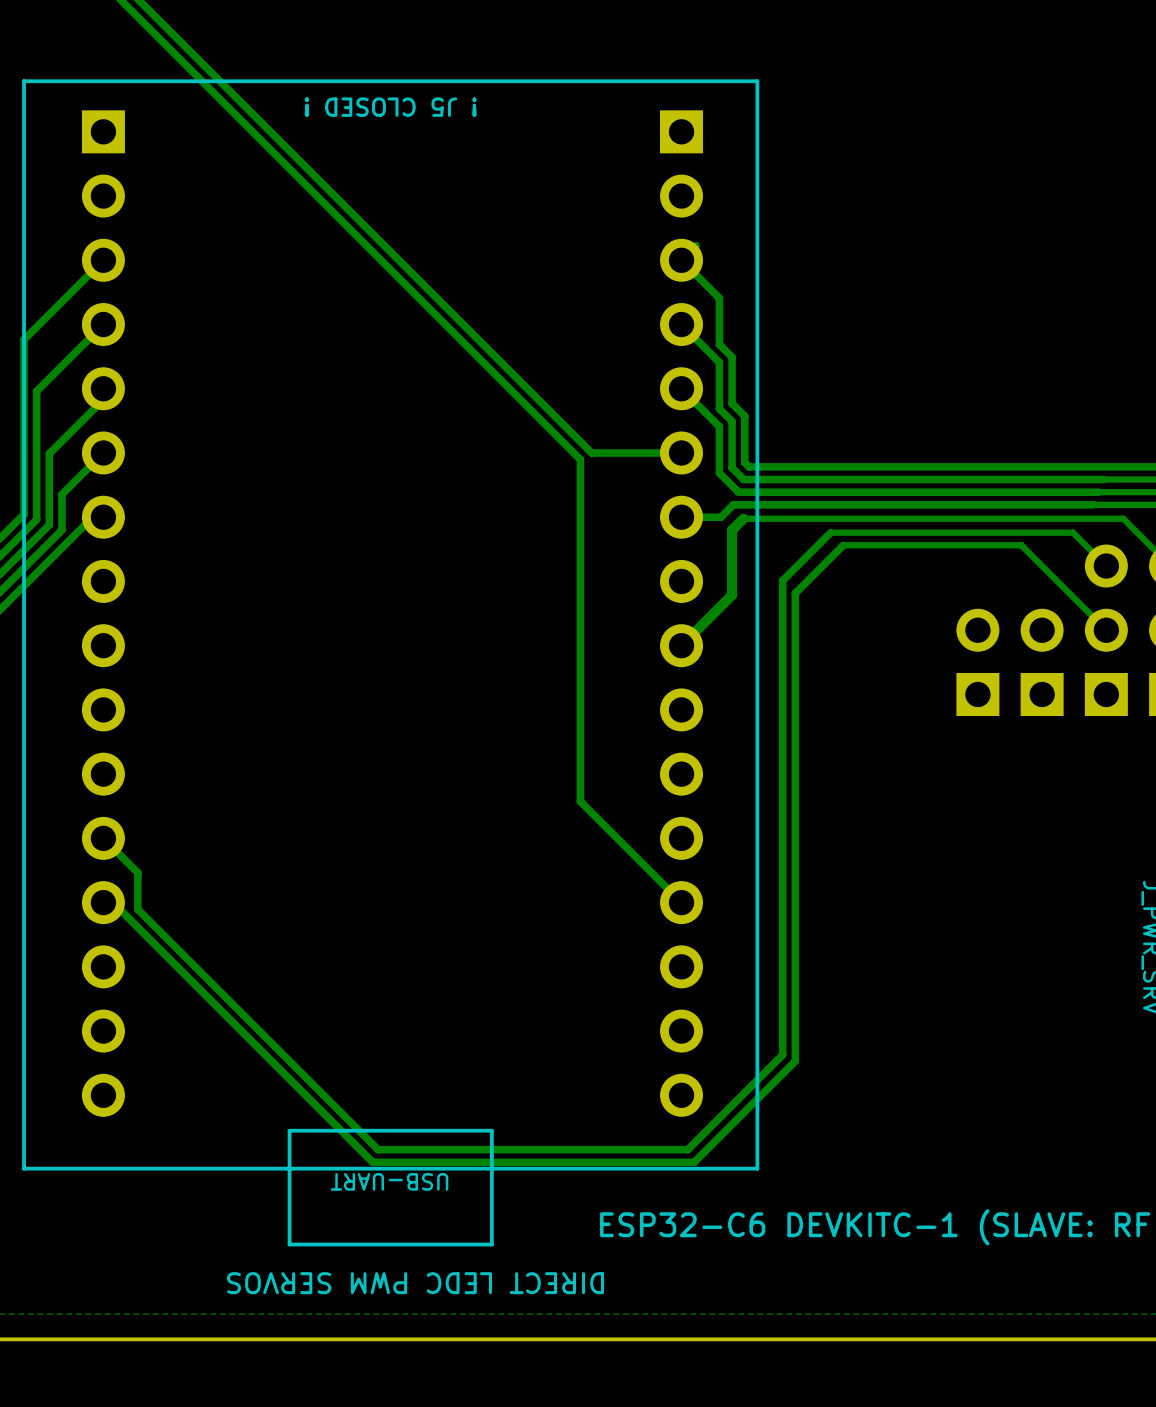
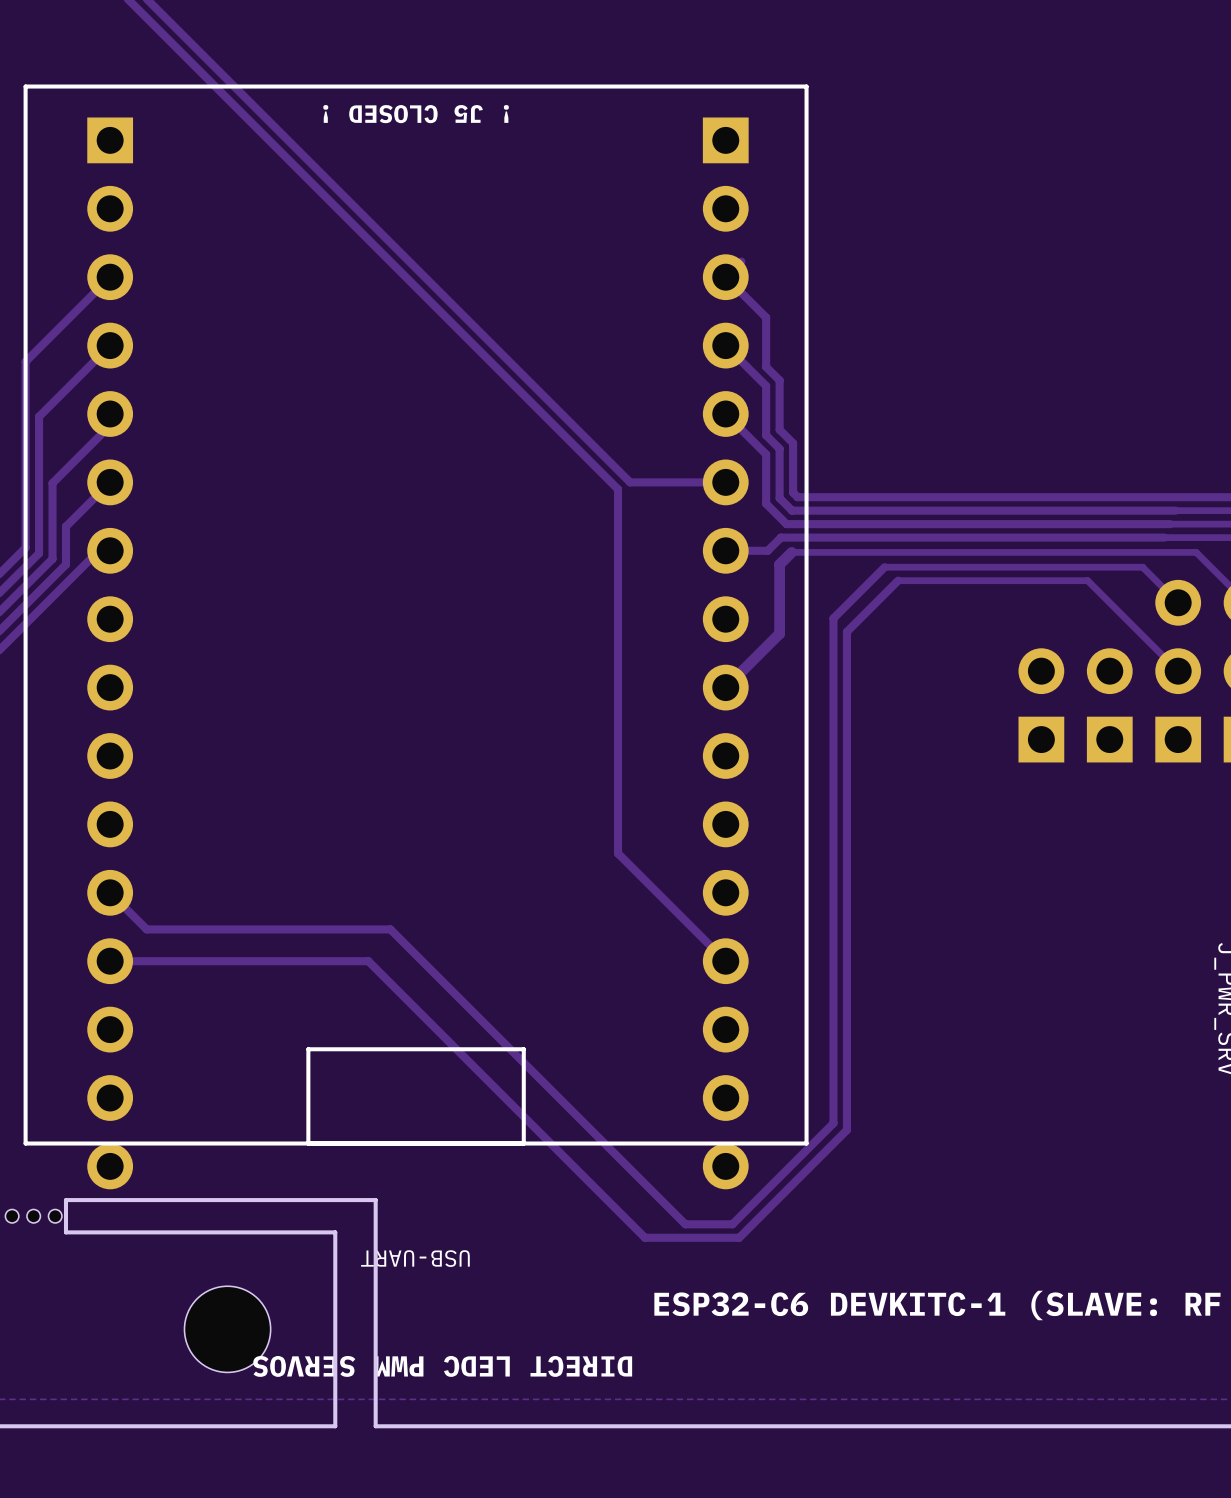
track: (137, 872) (137, 909) (378, 1149) (643, 1149) -> (146, 929) (390, 929) (685, 1224)
track: (113, 902) (372, 1162) (605, 1162) -> (120, 961) (368, 961) (644, 1237)
line: none -> (523, 1143) (523, 1049) (308, 1049) (308, 1143)
line: (757, 1073) (757, 1168) (24, 1168) (24, 1073) -> (806, 1143) (25, 1143)
line: (491, 1130) (289, 1130) (289, 1244) (491, 1244) (491, 1130) -> none
part: none -> (12, 1216)
part: none -> (33, 1216)
part: none -> (55, 1216)
part: none -> (227, 1329)
board edge: (352, 1339) (314, 1339) -> (375, 1426) (375, 1200) (65, 1200) (65, 1232) (335, 1232) (335, 1426)

